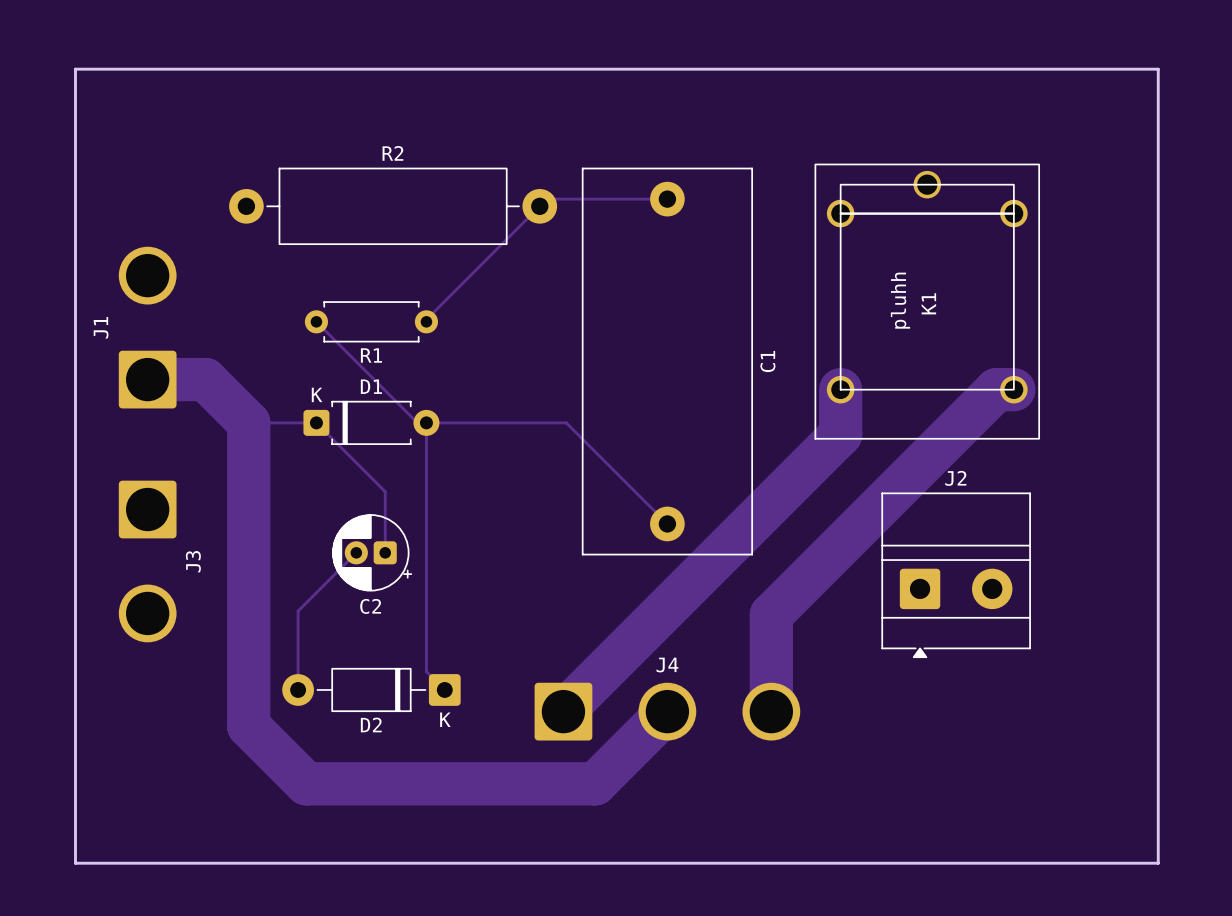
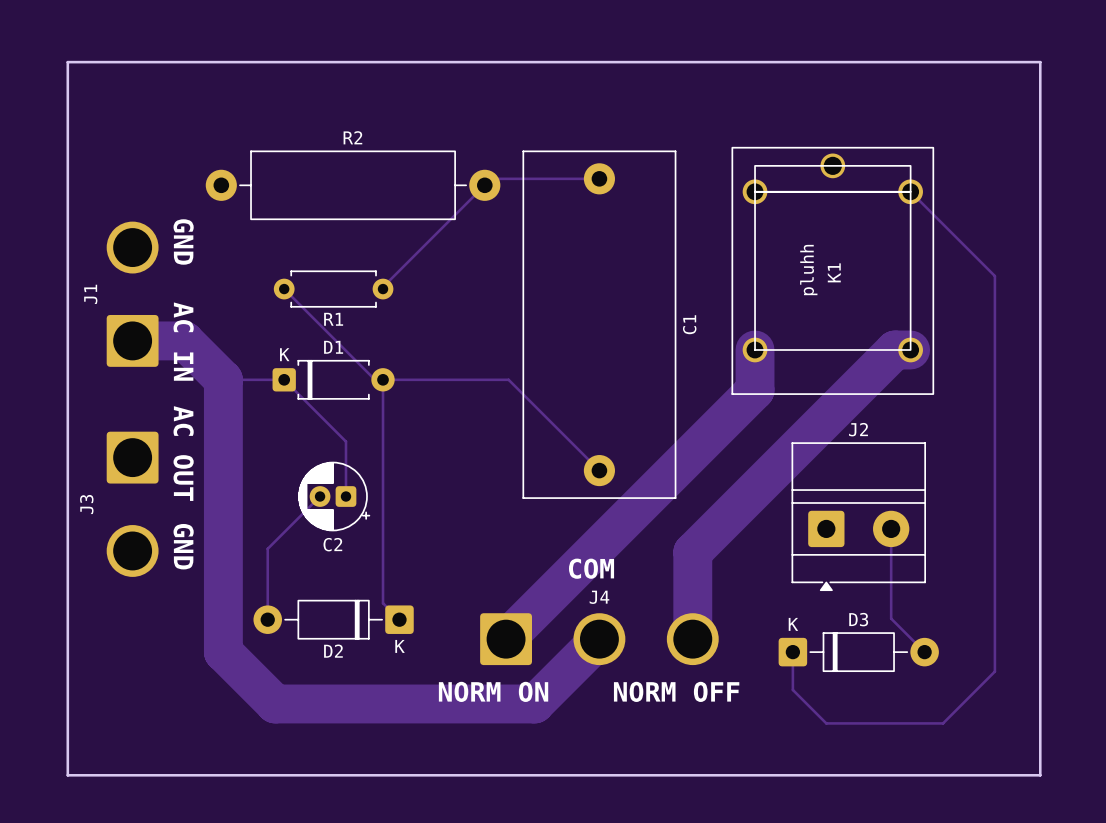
track: none -> (910, 191) (994, 276) (994, 671) (943, 723) (826, 723) (792, 689) (792, 652)
text: none -> GND (183, 241)
text: none -> AC IN (183, 341)
text: none -> AC OUT (183, 453)
J3 name position: J3 (193, 561) -> J3 (86, 504)
track: none -> (891, 528) (891, 618) (924, 652)
text: none -> GND (183, 546)
text: none -> COM (591, 568)
D3: none -> (858, 652)
text: none -> NORM ON (493, 691)
text: none -> NORM OFF (676, 691)

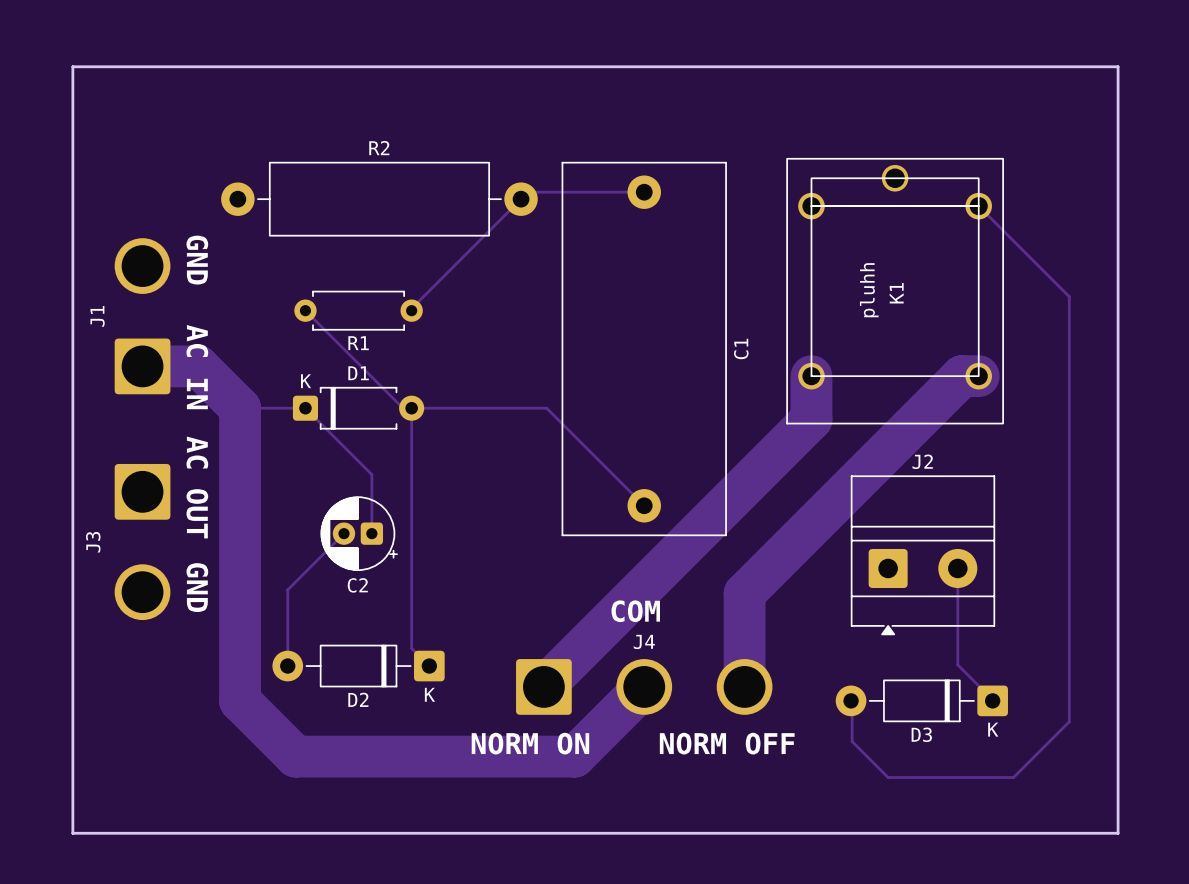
D3 rotation: 0° (858, 652) -> 180° (921, 700)

